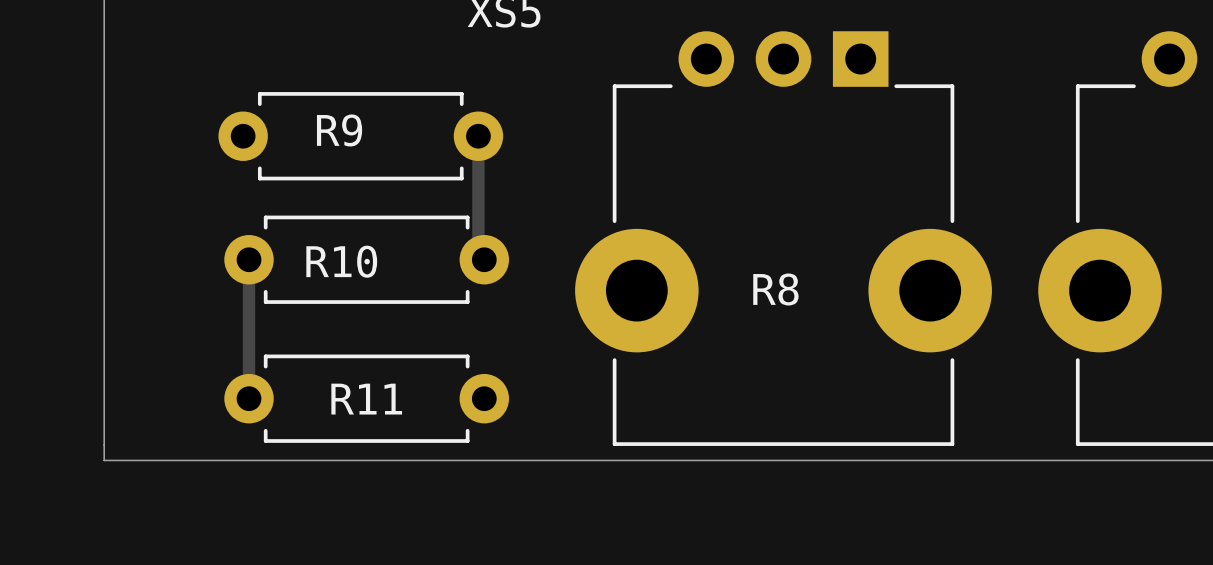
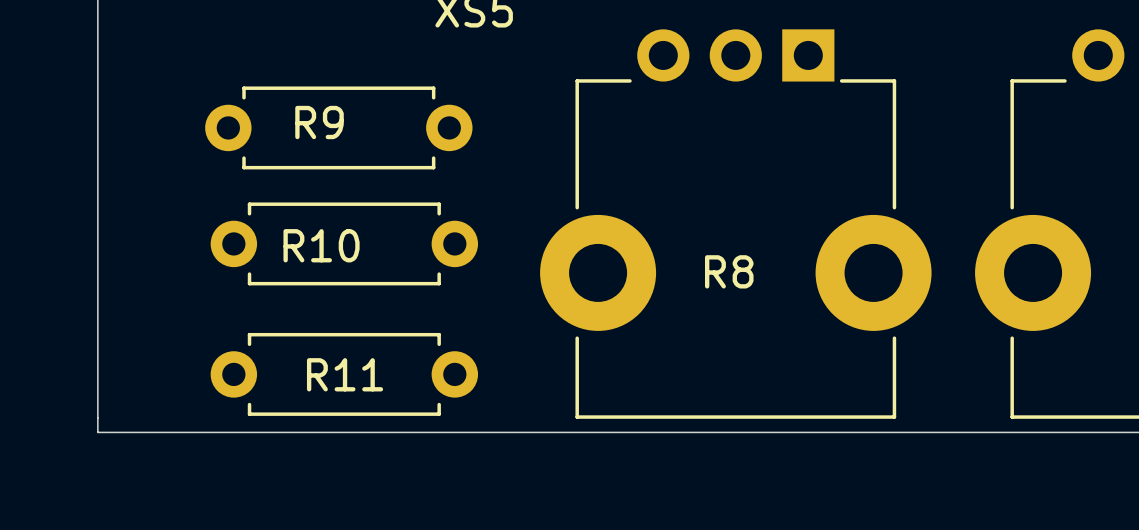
track: (478, 136) (478, 253) (484, 259) -> none
track: (249, 259) (249, 398) -> none

